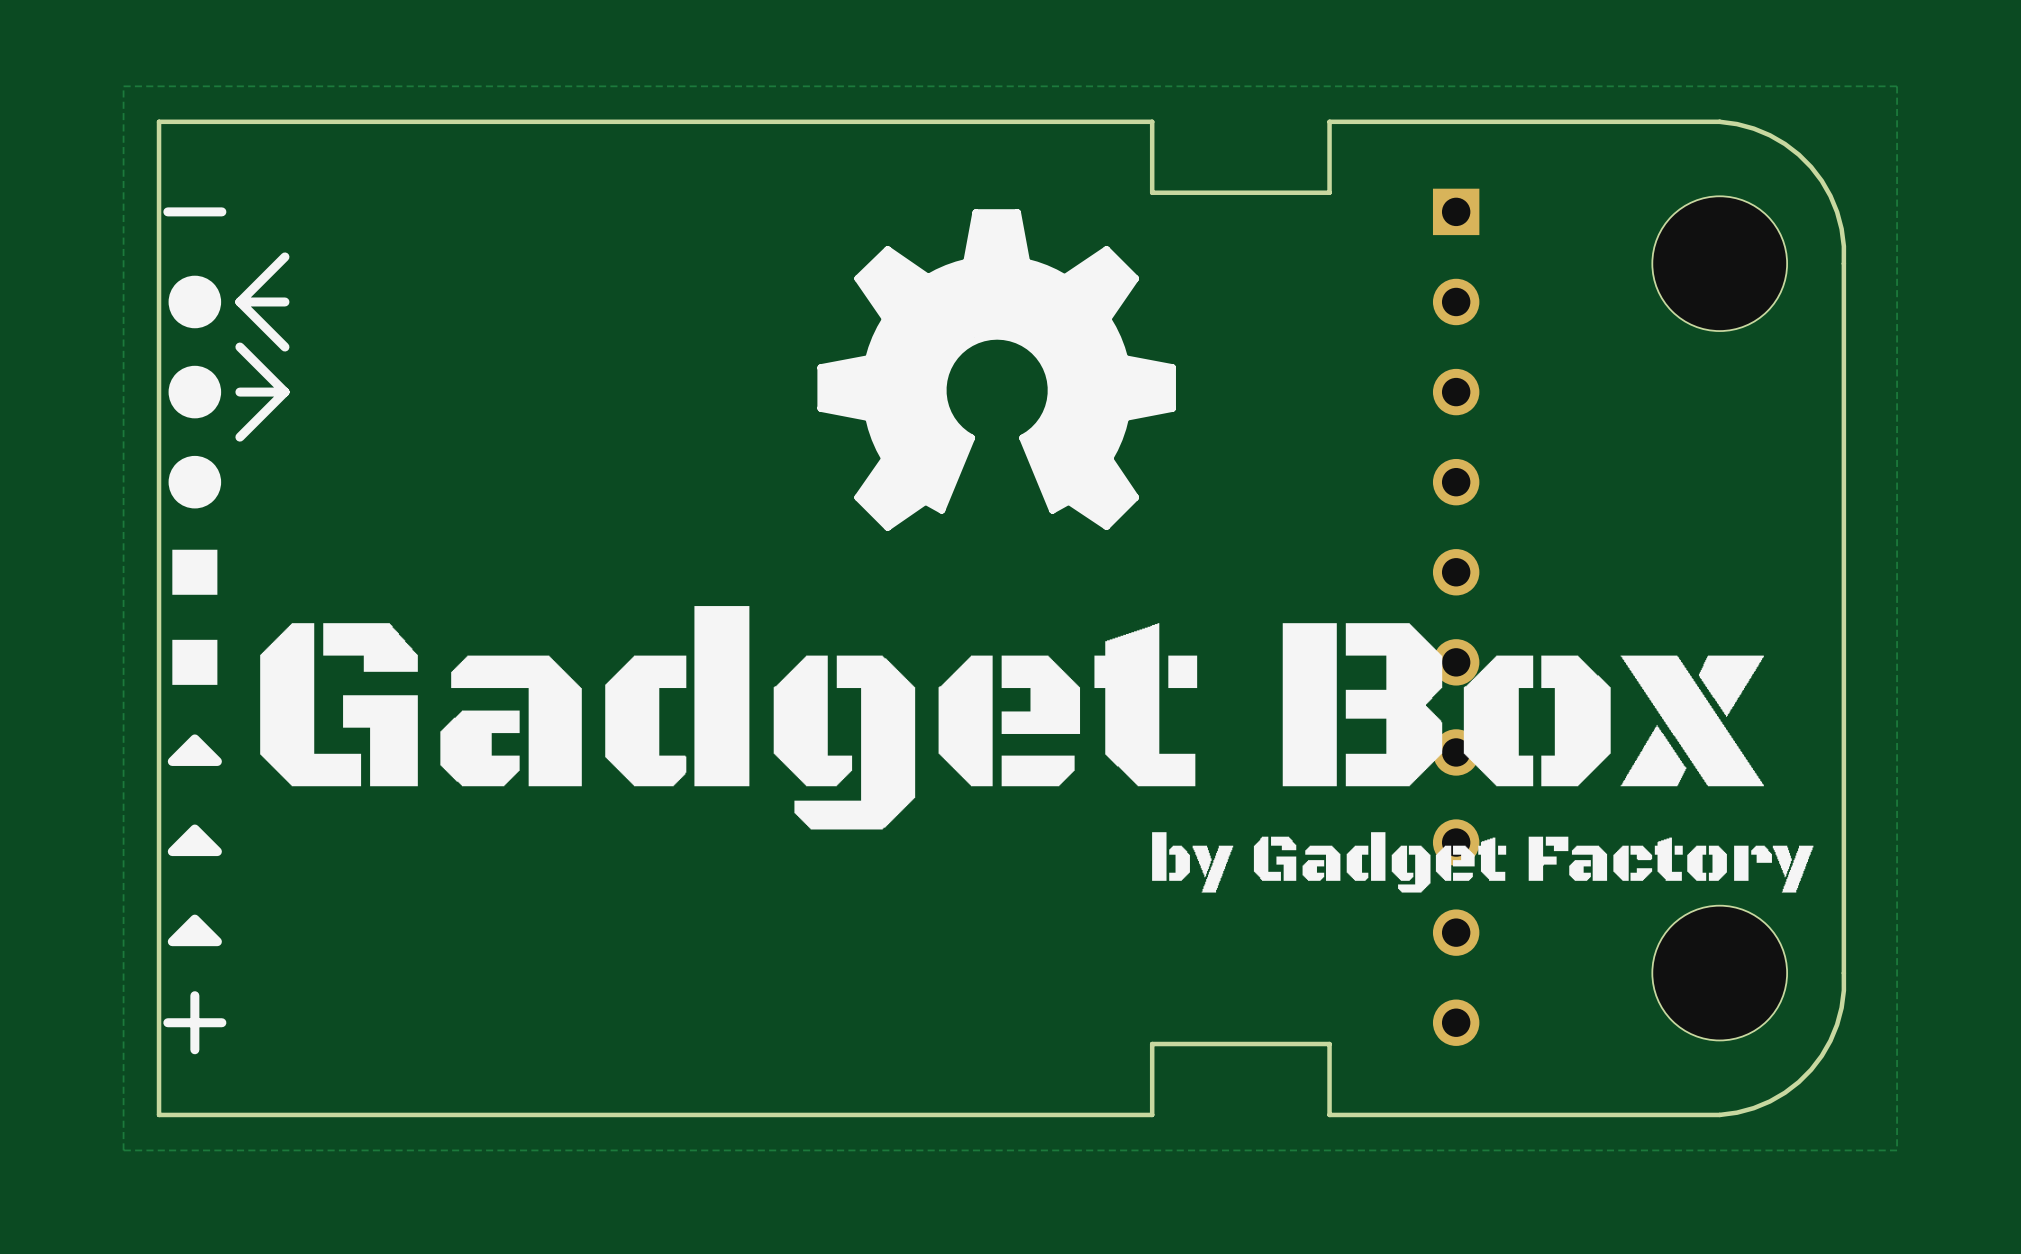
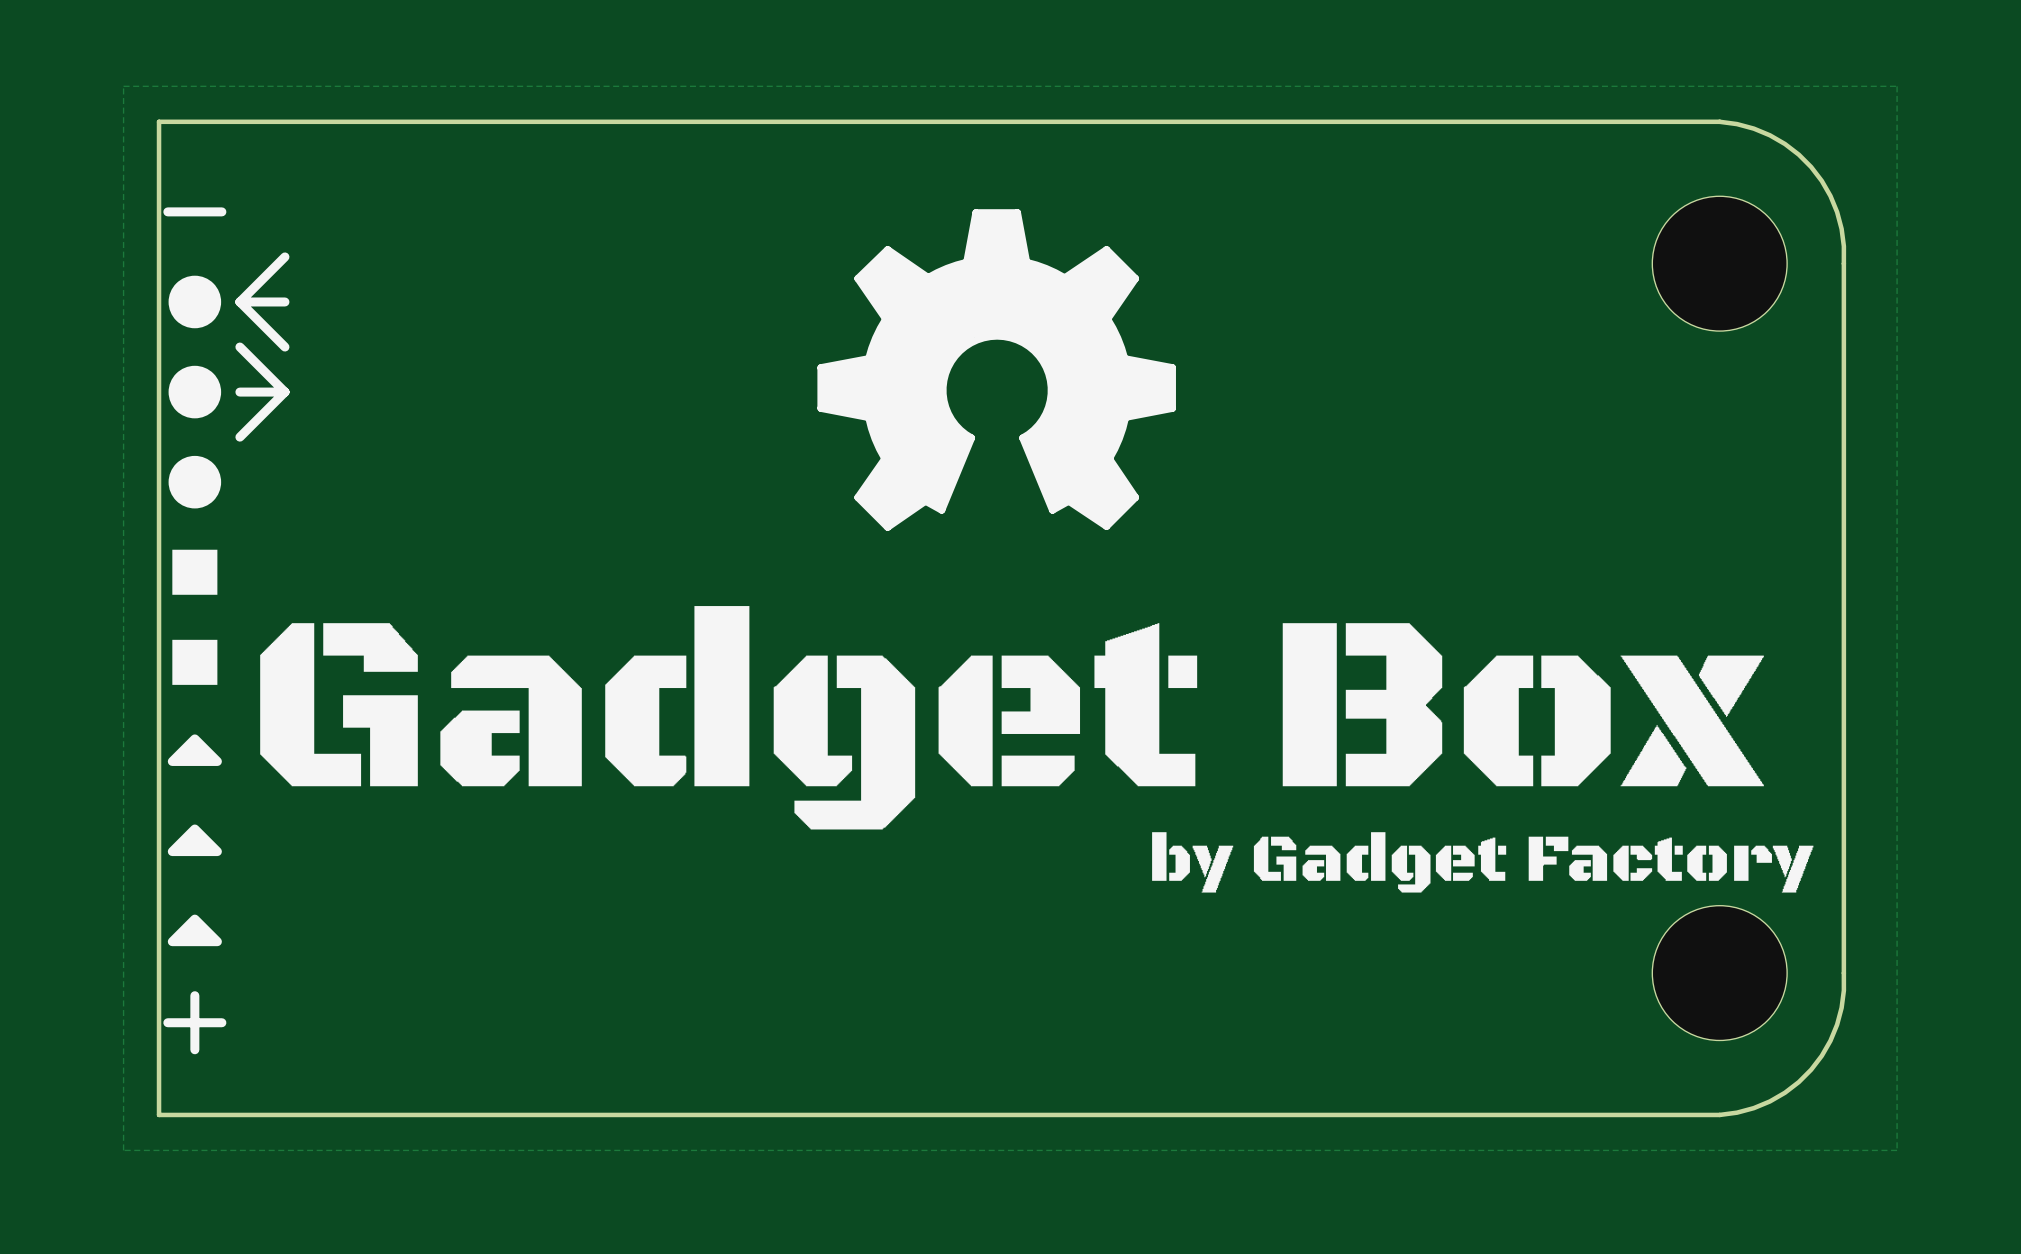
part footprint: [156, 119, 1847, 1118] -> [156, 119, 1847, 1118]

